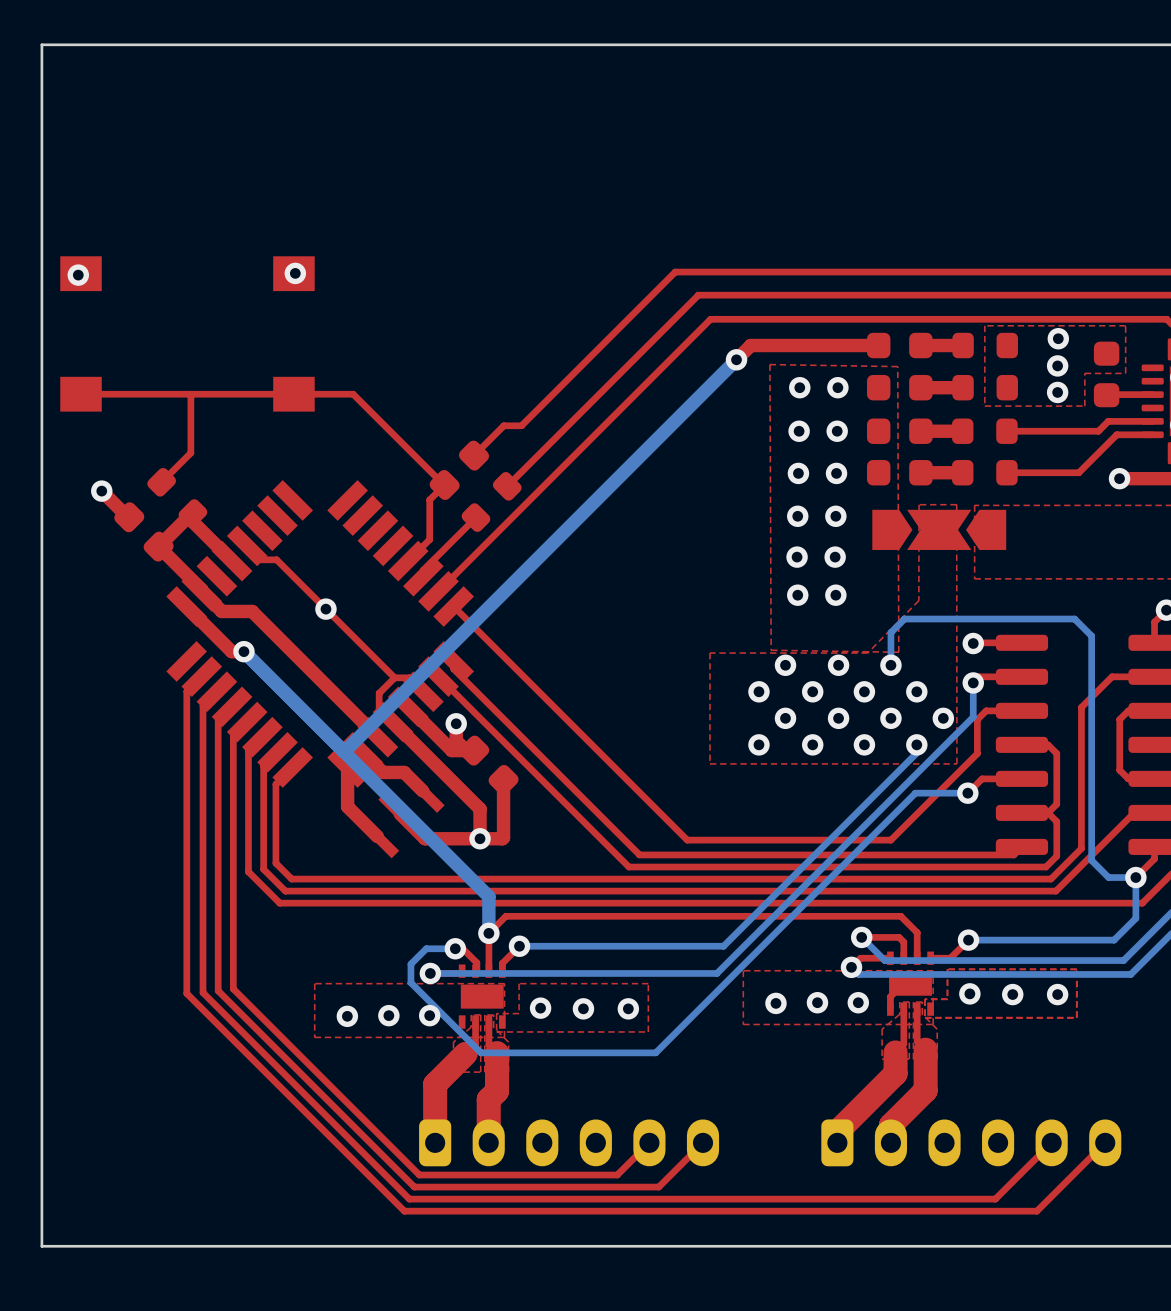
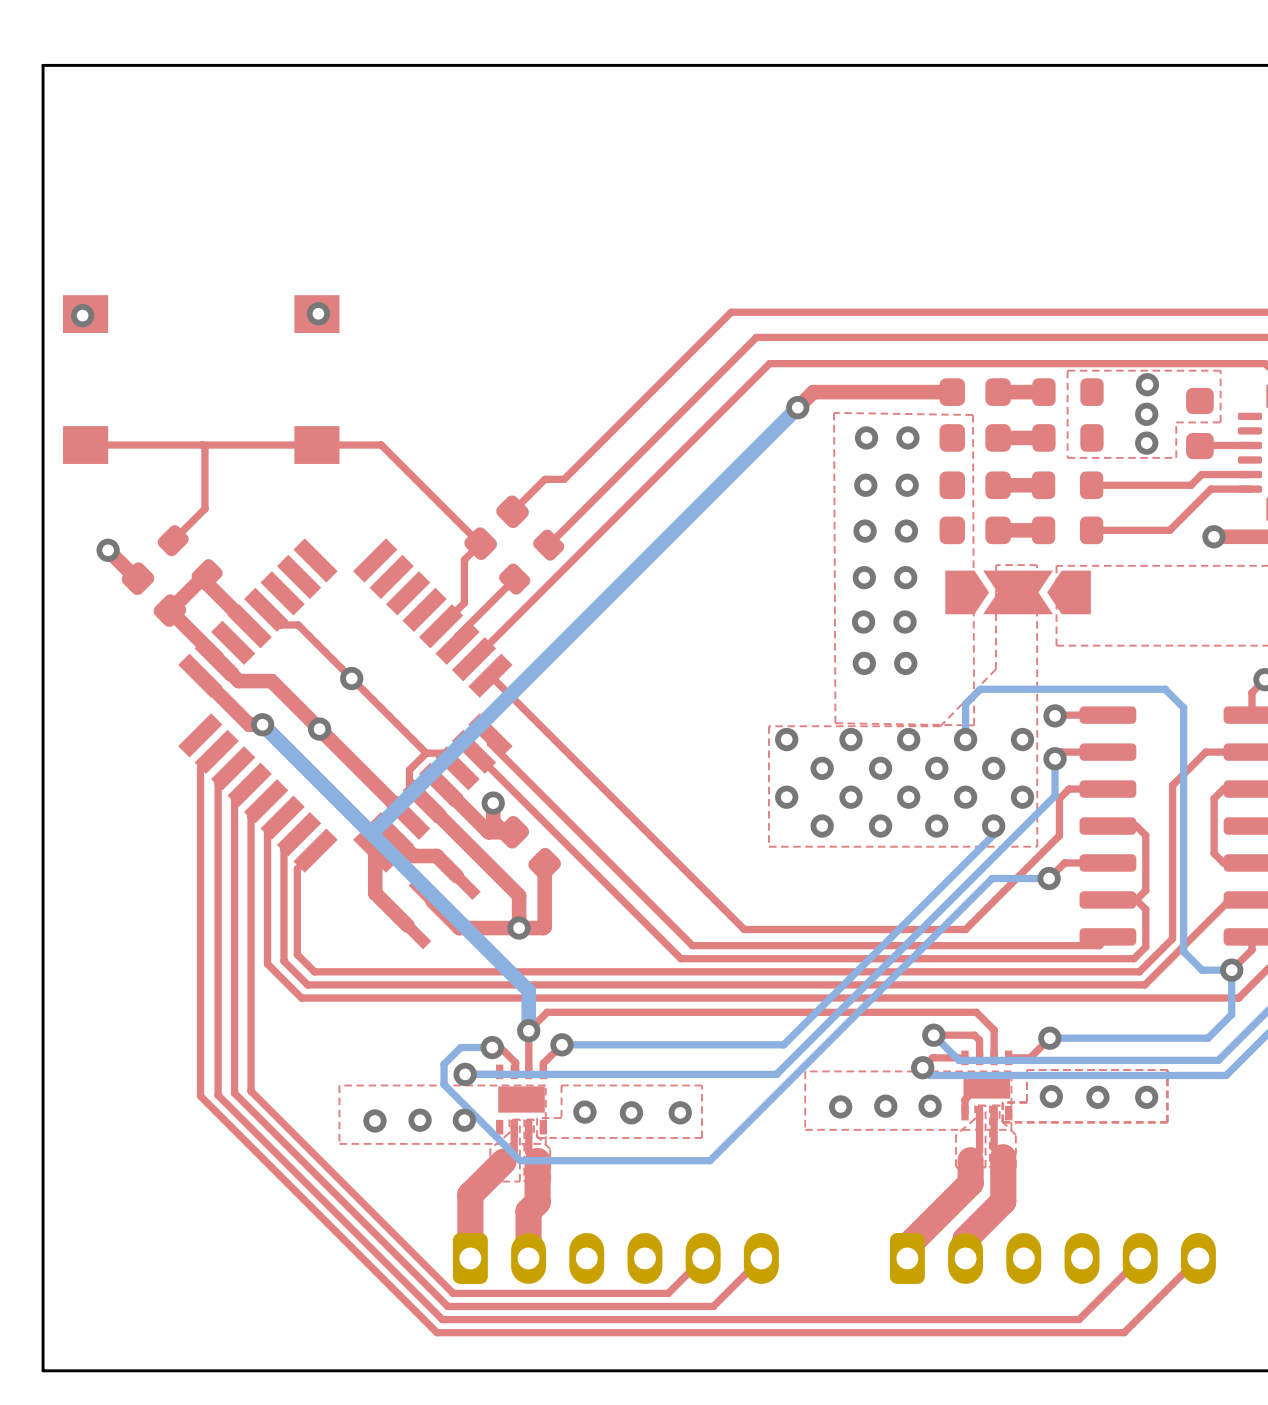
via: none -> (319, 729)
via: none -> (786, 739)
via: none -> (1022, 739)
via: none -> (786, 797)

